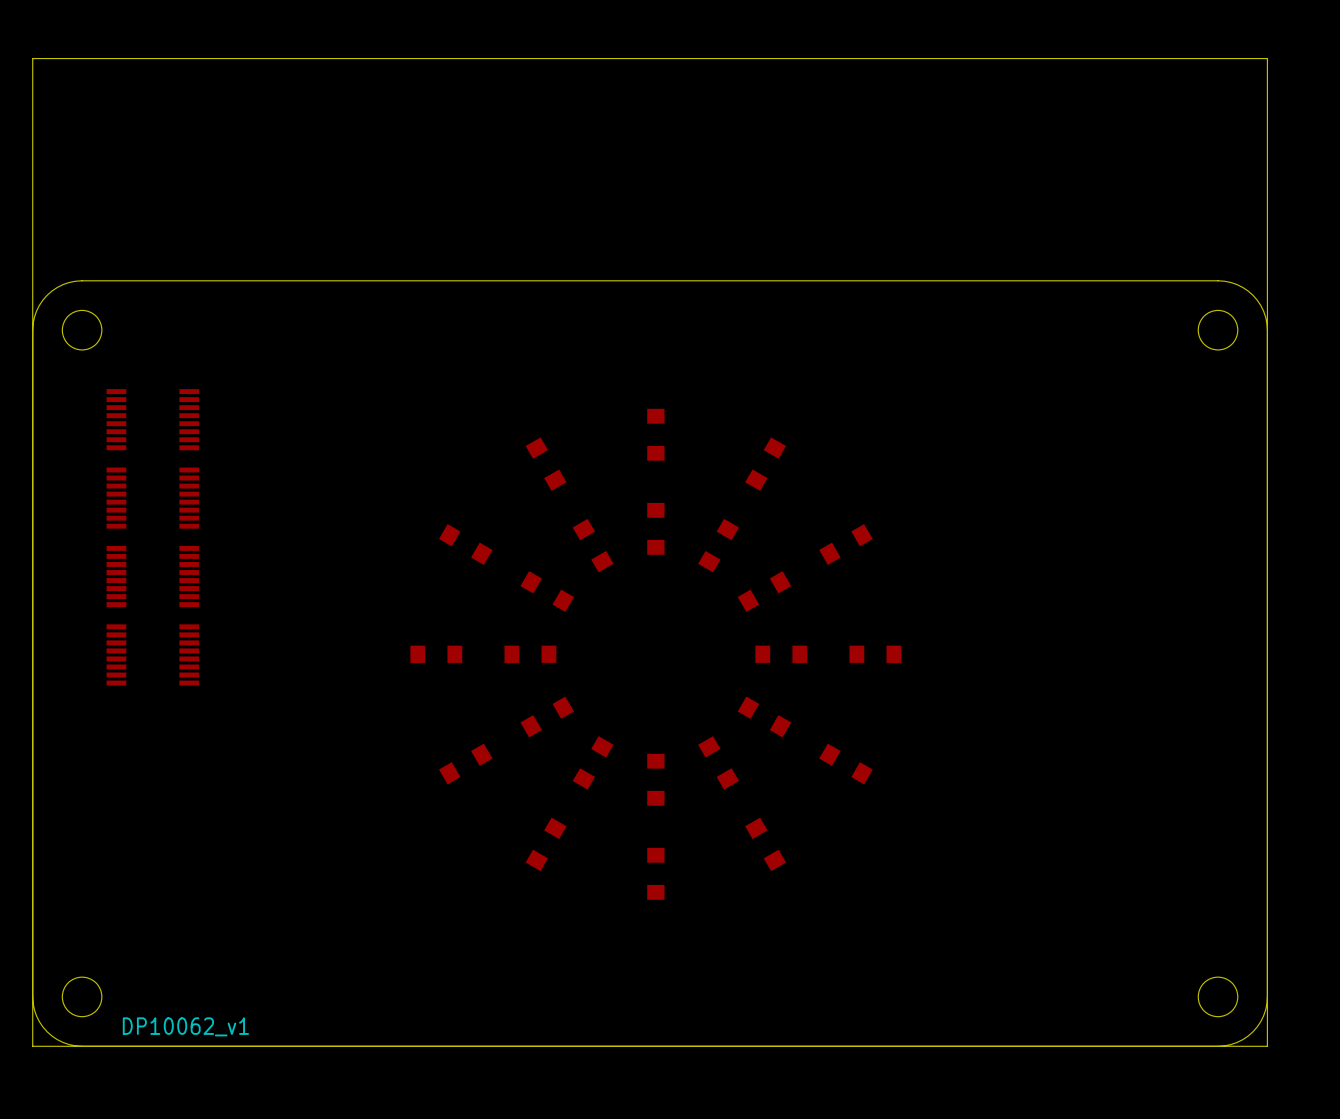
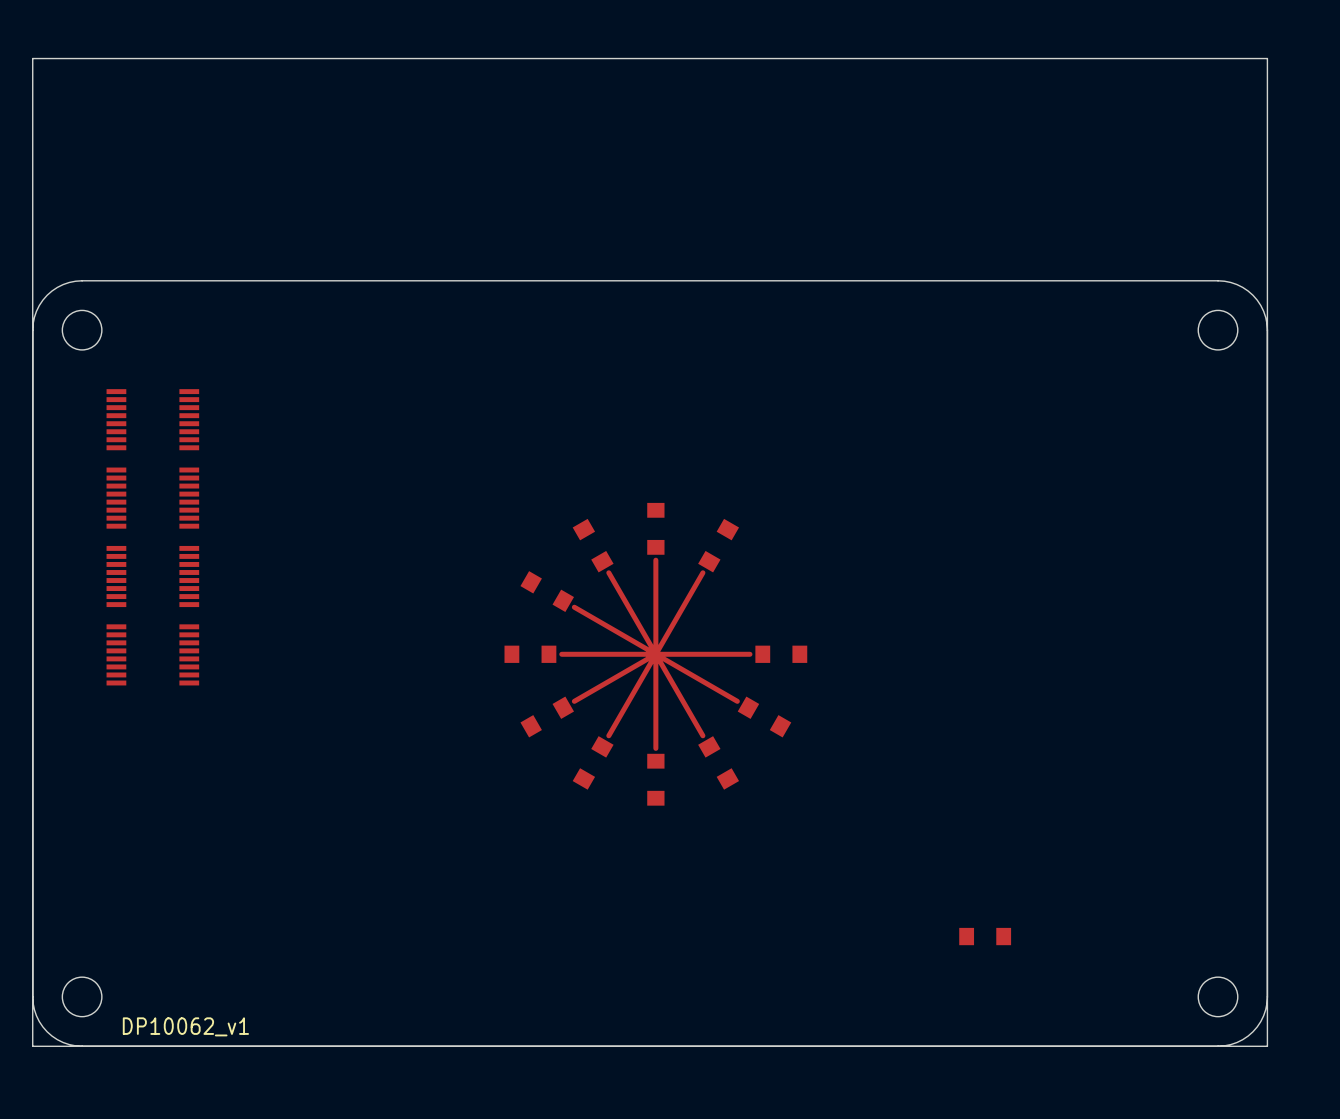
part: (655, 434) -> none
part: (546, 464) -> none
part: (765, 464) -> none
part: (465, 544) -> none
part: (845, 544) -> none
top track: none -> (655, 560) (655, 748)
top track: none -> (608, 572) (702, 735)
top track: none -> (702, 572) (608, 735)
part: (764, 591) -> none
top track: none -> (574, 607) (737, 701)
part: (436, 654) -> none
top track: none -> (655, 654) (574, 701)
top track: none -> (749, 654) (561, 654)
part: (875, 654) -> none
part: (465, 764) -> none
part: (845, 764) -> none
part: (546, 844) -> none
part: (765, 844) -> none
part: (655, 873) -> none
part: none -> (985, 936)

